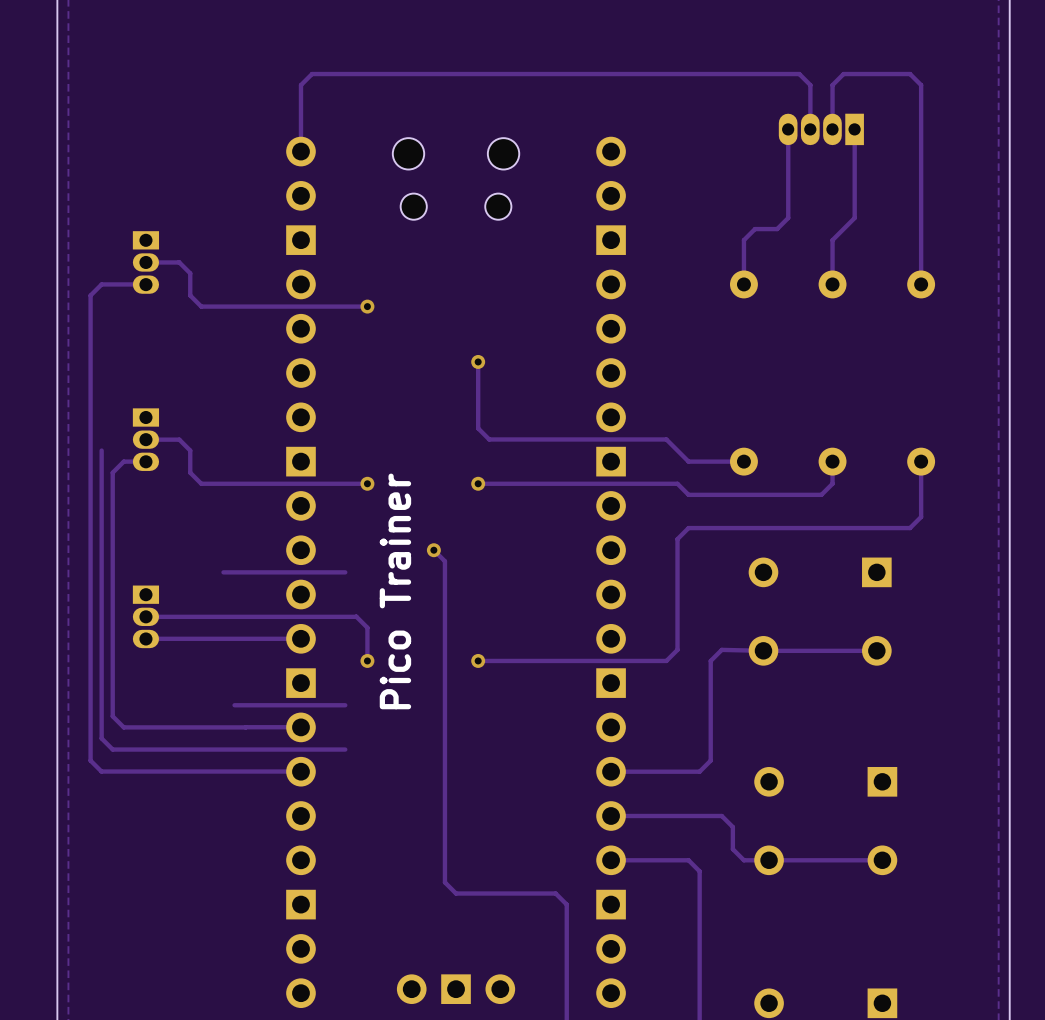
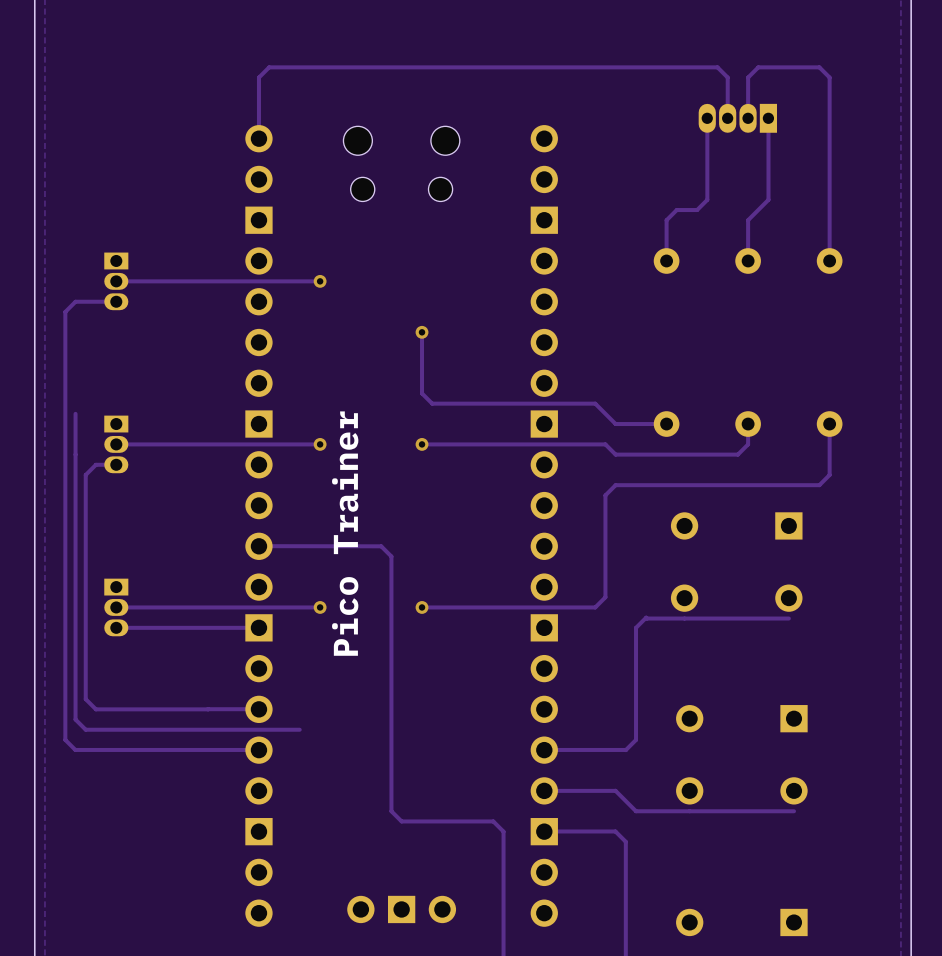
part position: (145, 262) -> (116, 281)
track: (179, 262) (190, 273) (190, 295) (201, 306) -> (116, 281) (167, 281)
track: (179, 262) (145, 262) -> none
track: (145, 284) (101, 284) (90, 295) (90, 339) -> (116, 301) (75, 301) (65, 311)
track: (145, 439) (179, 439) (190, 450) (190, 472) (201, 483) -> (116, 444) (167, 444)
part position: (145, 439) -> (116, 444)
track: (145, 461) (123, 461) (112, 472) (112, 516) -> (116, 464) (95, 464) (85, 474)
track: (433, 550) (444, 561) (444, 605) -> (258, 546) (381, 546) (391, 556)
via: (433, 550) -> none
track: (345, 572) (223, 572) -> none
part position: (145, 616) -> (116, 607)
track: (356, 616) (367, 627) (367, 660) -> (116, 607) (320, 607)
track: (356, 616) (145, 616) -> none
track: (300, 638) (145, 638) -> (258, 627) (116, 627)
track: (876, 650) (721, 649) (710, 660) (710, 683) -> (788, 618) (646, 617) (636, 627)
track: (345, 705) (234, 705) -> none
track: (112, 716) (123, 727) (245, 727) -> (85, 658) (85, 699) (95, 709) (208, 709)
track: (300, 727) (245, 727) -> none
track: (101, 738) (112, 749) (345, 749) -> (75, 678) (75, 719) (85, 729) (299, 729)
track: (90, 760) (101, 771) (245, 771) -> (65, 699) (65, 739) (75, 749) (248, 749)
track: (710, 760) (699, 771) (611, 771) -> (636, 699) (636, 739) (625, 750)
track: (611, 815) (721, 815) (732, 827) (732, 849) (743, 860) (882, 860) -> (544, 749) (625, 749)
track: (699, 871) (699, 915) -> (544, 831) (615, 831) (625, 841)
track: none -> (625, 801) (636, 811) (794, 811)

